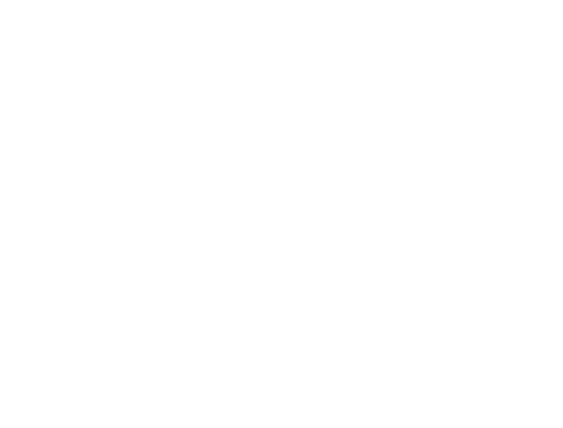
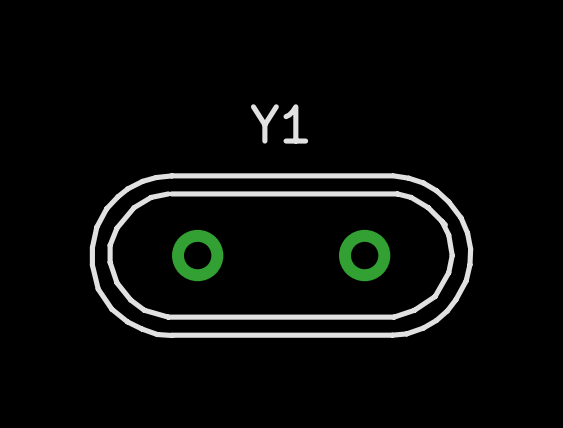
Y1: none -> (281, 255)

